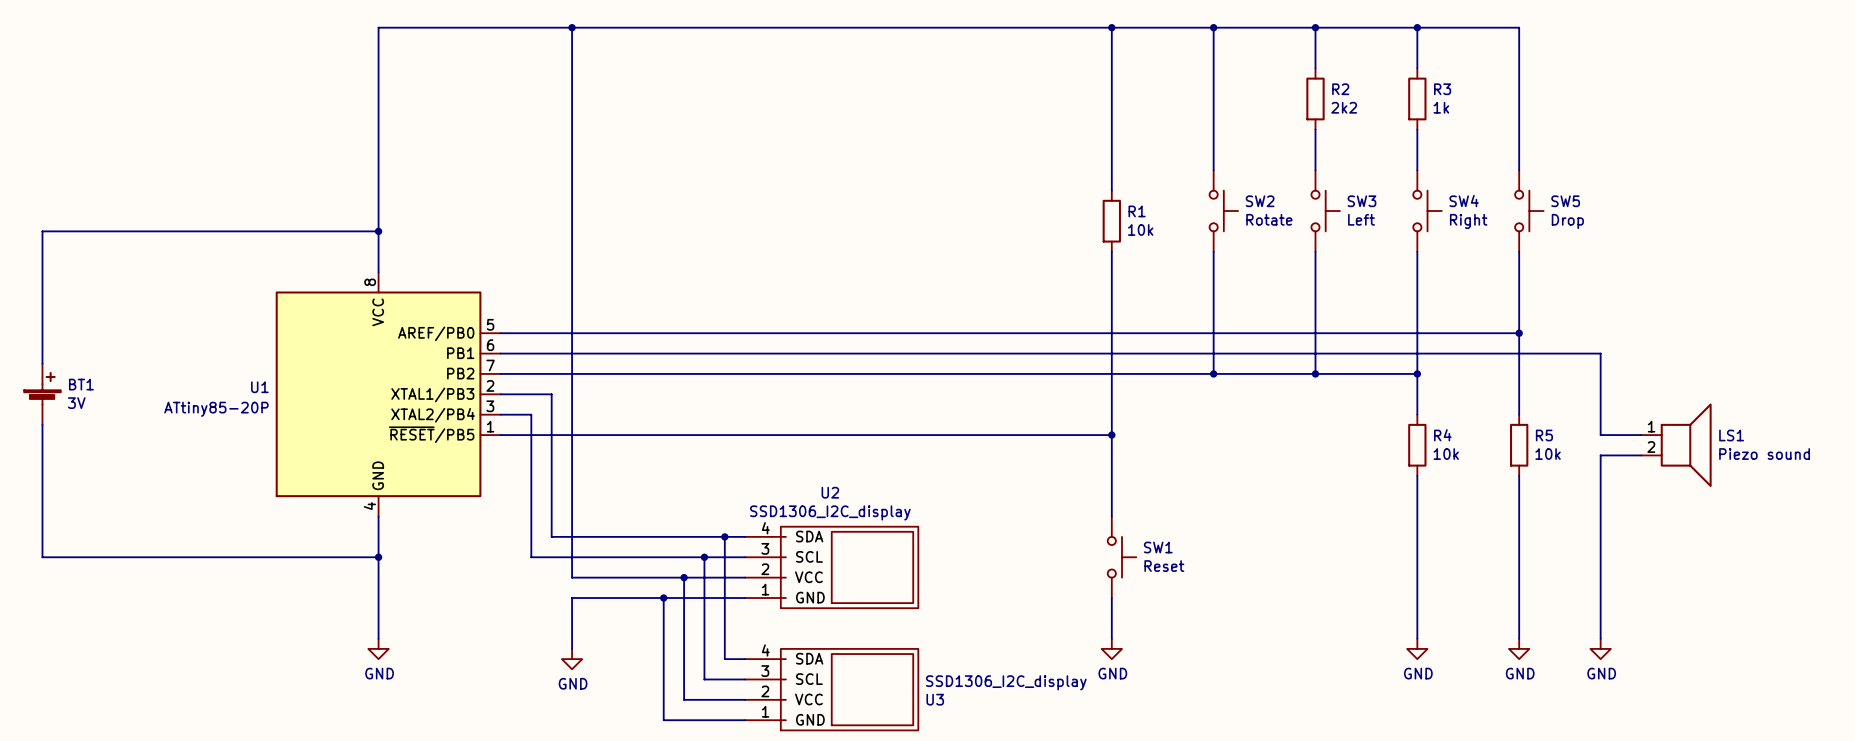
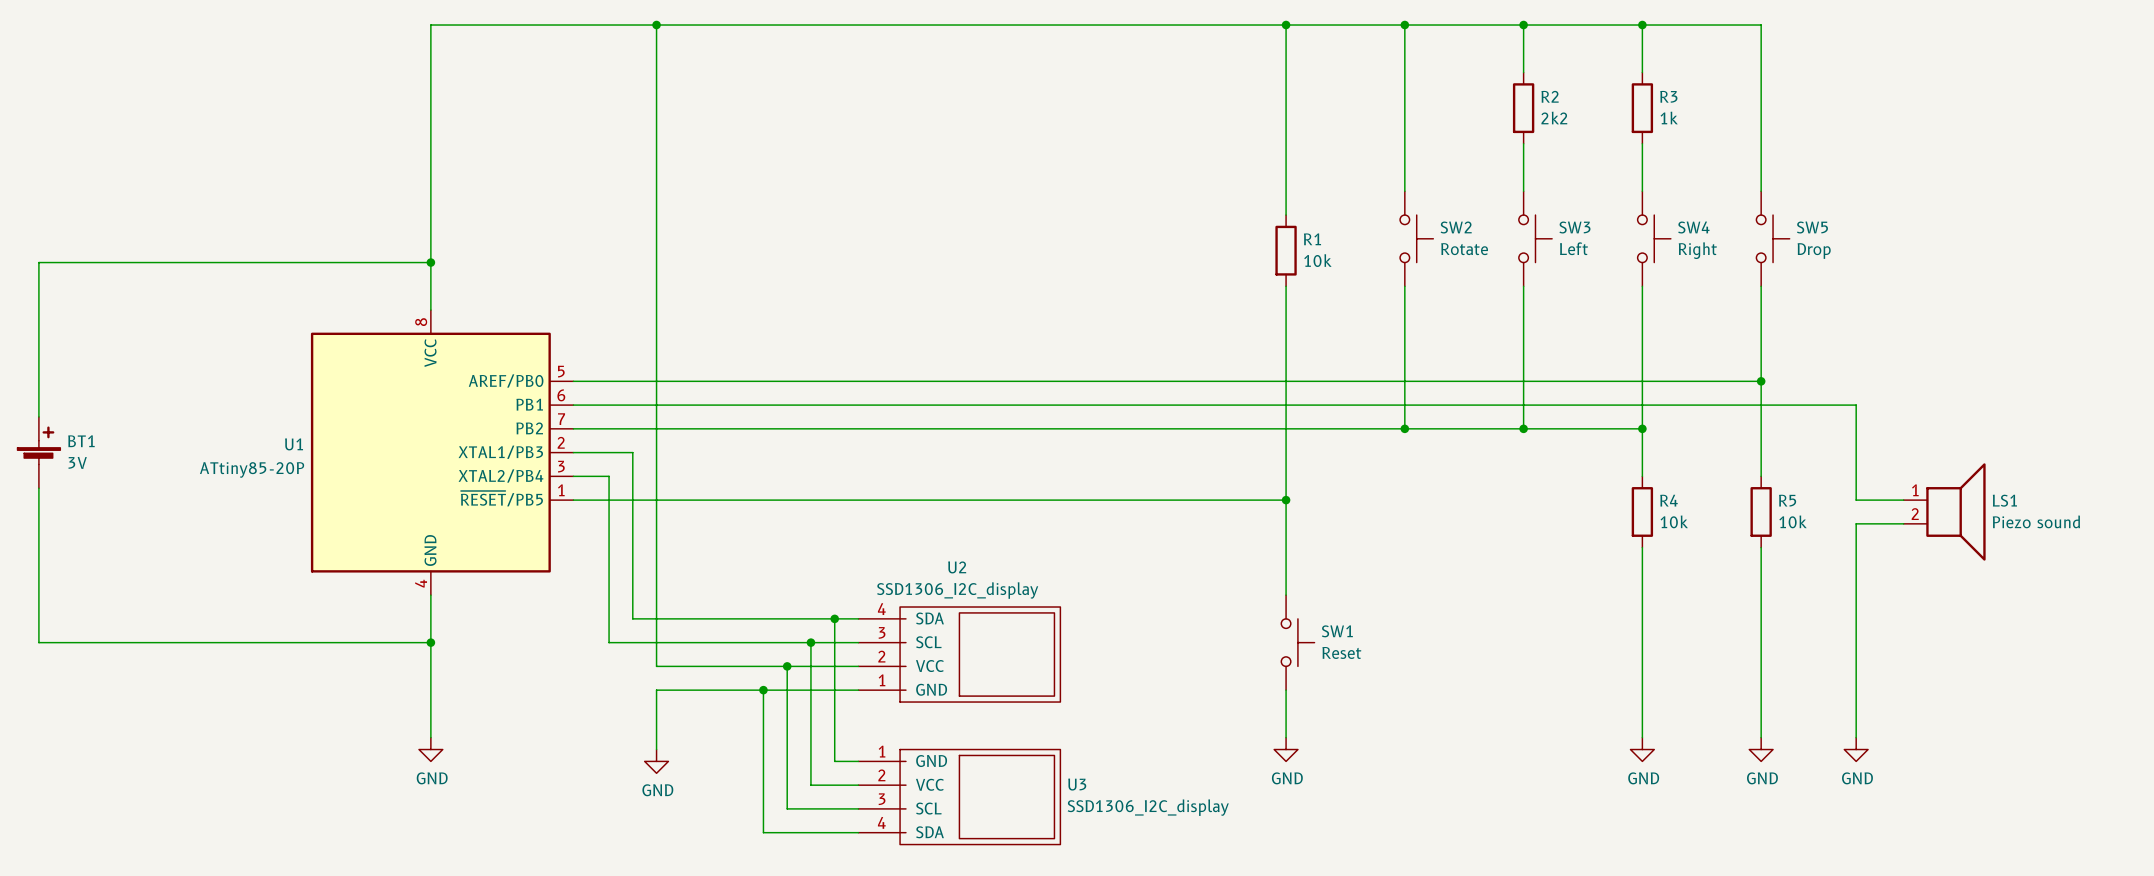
U3 flip: as is (849, 689) -> up-down (980, 797)

